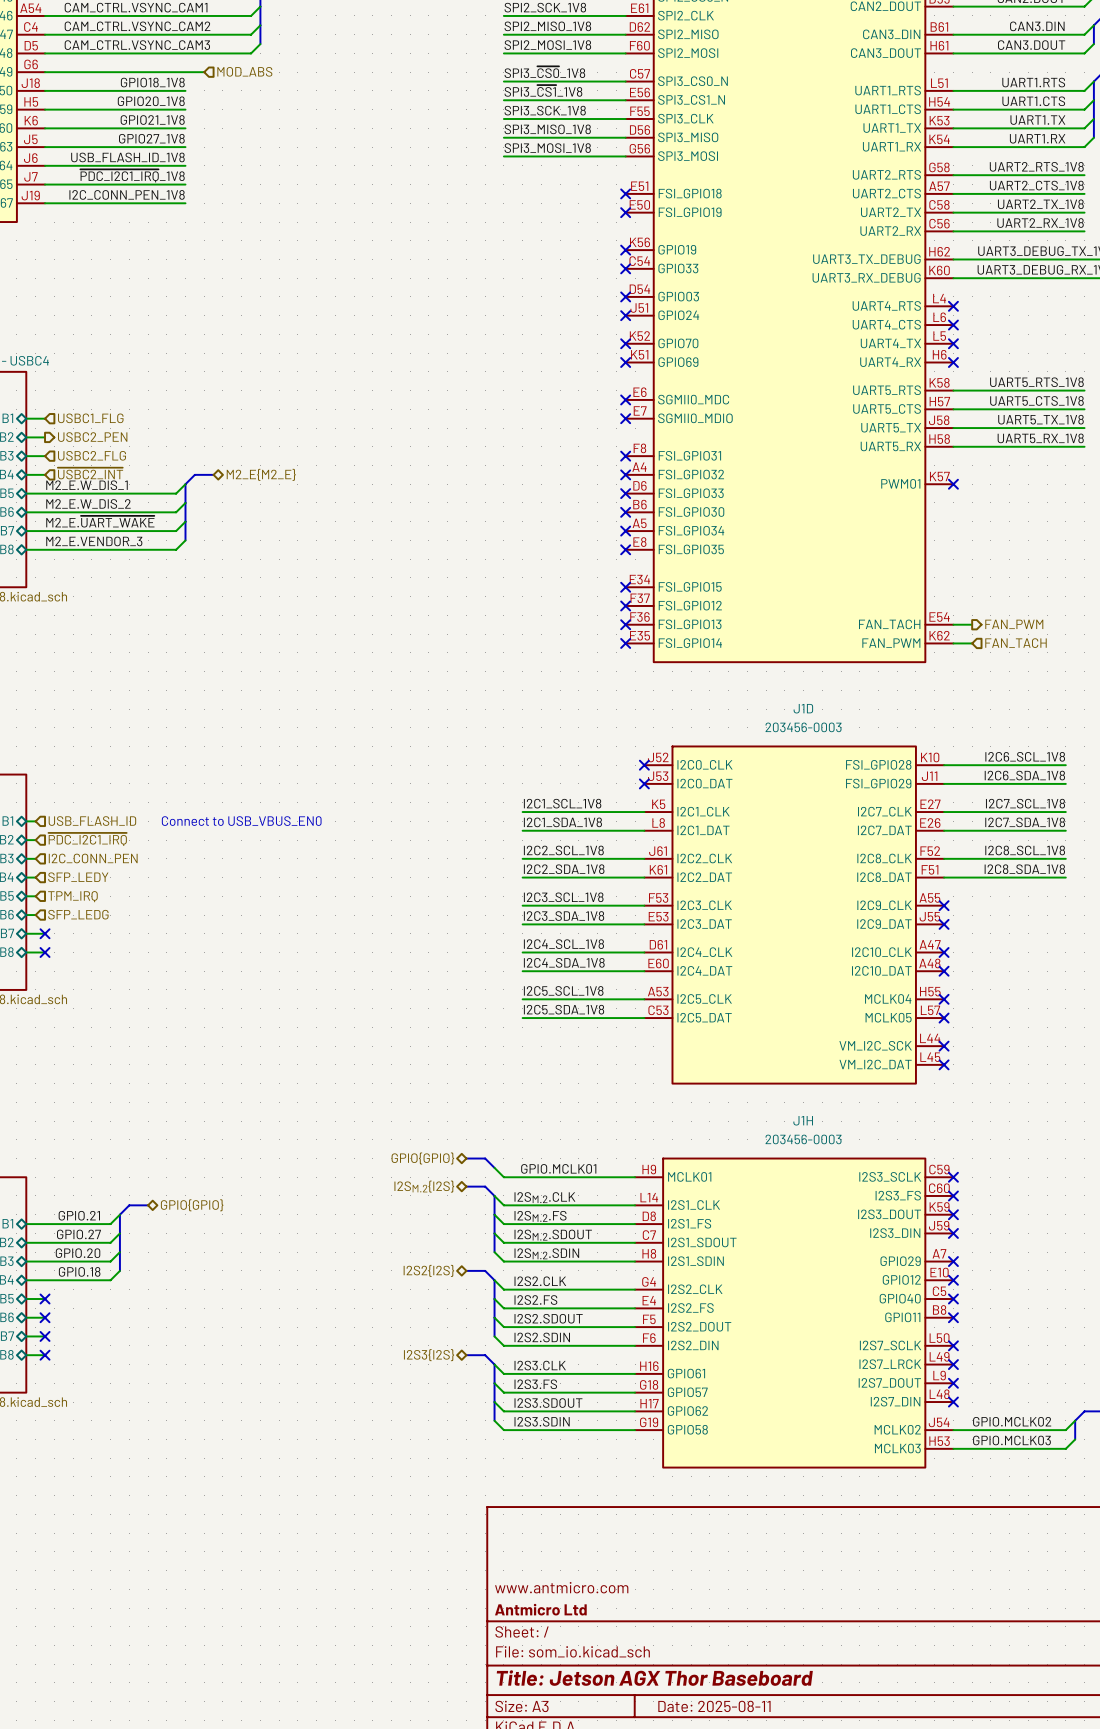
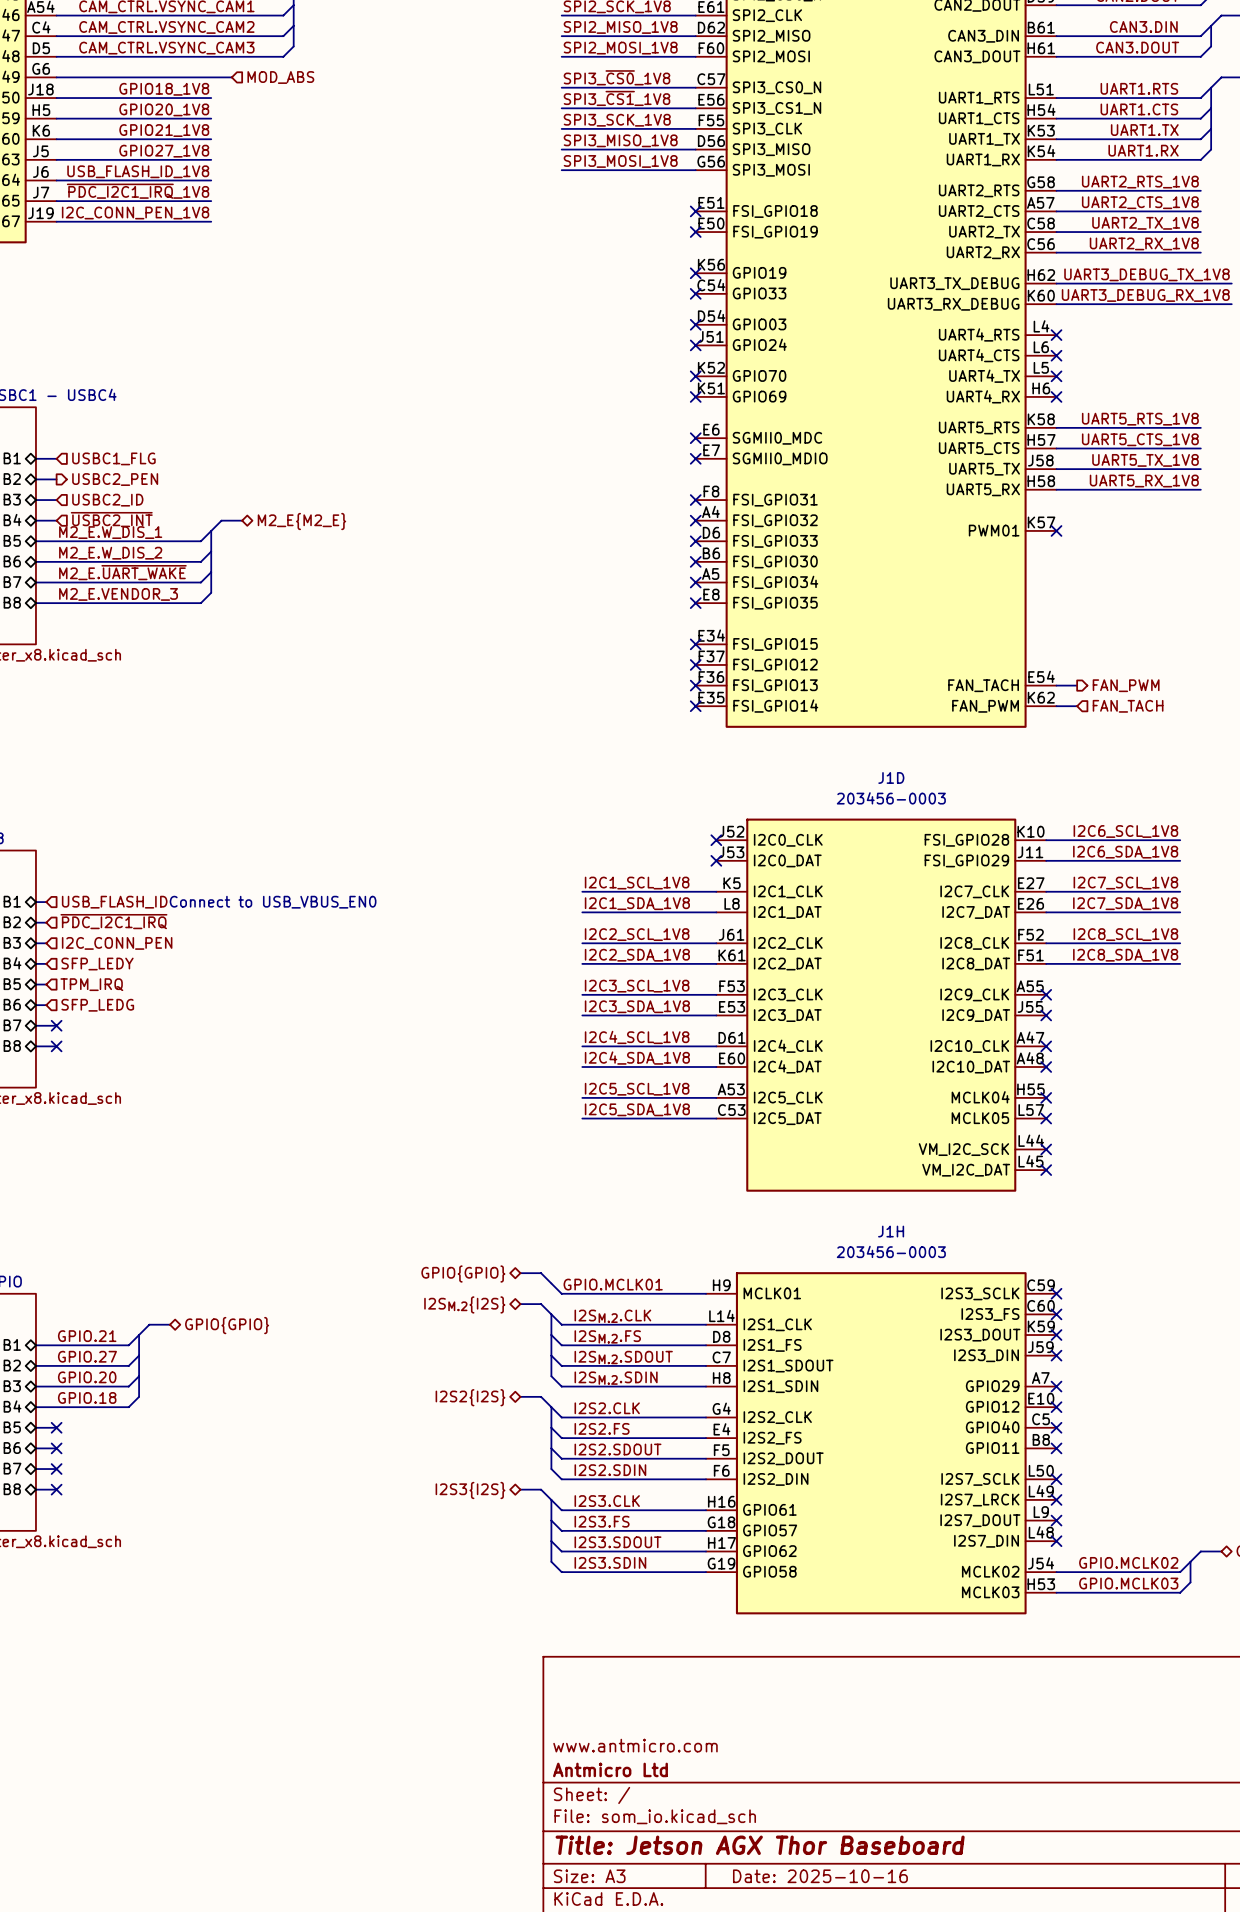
hierarchical label: USBC2_FLG (92, 455) -> USBC2_ID (107, 500)
title block: Date: 2025-08-11 (714, 1706) -> Date: 2025-10-16 (820, 1876)

